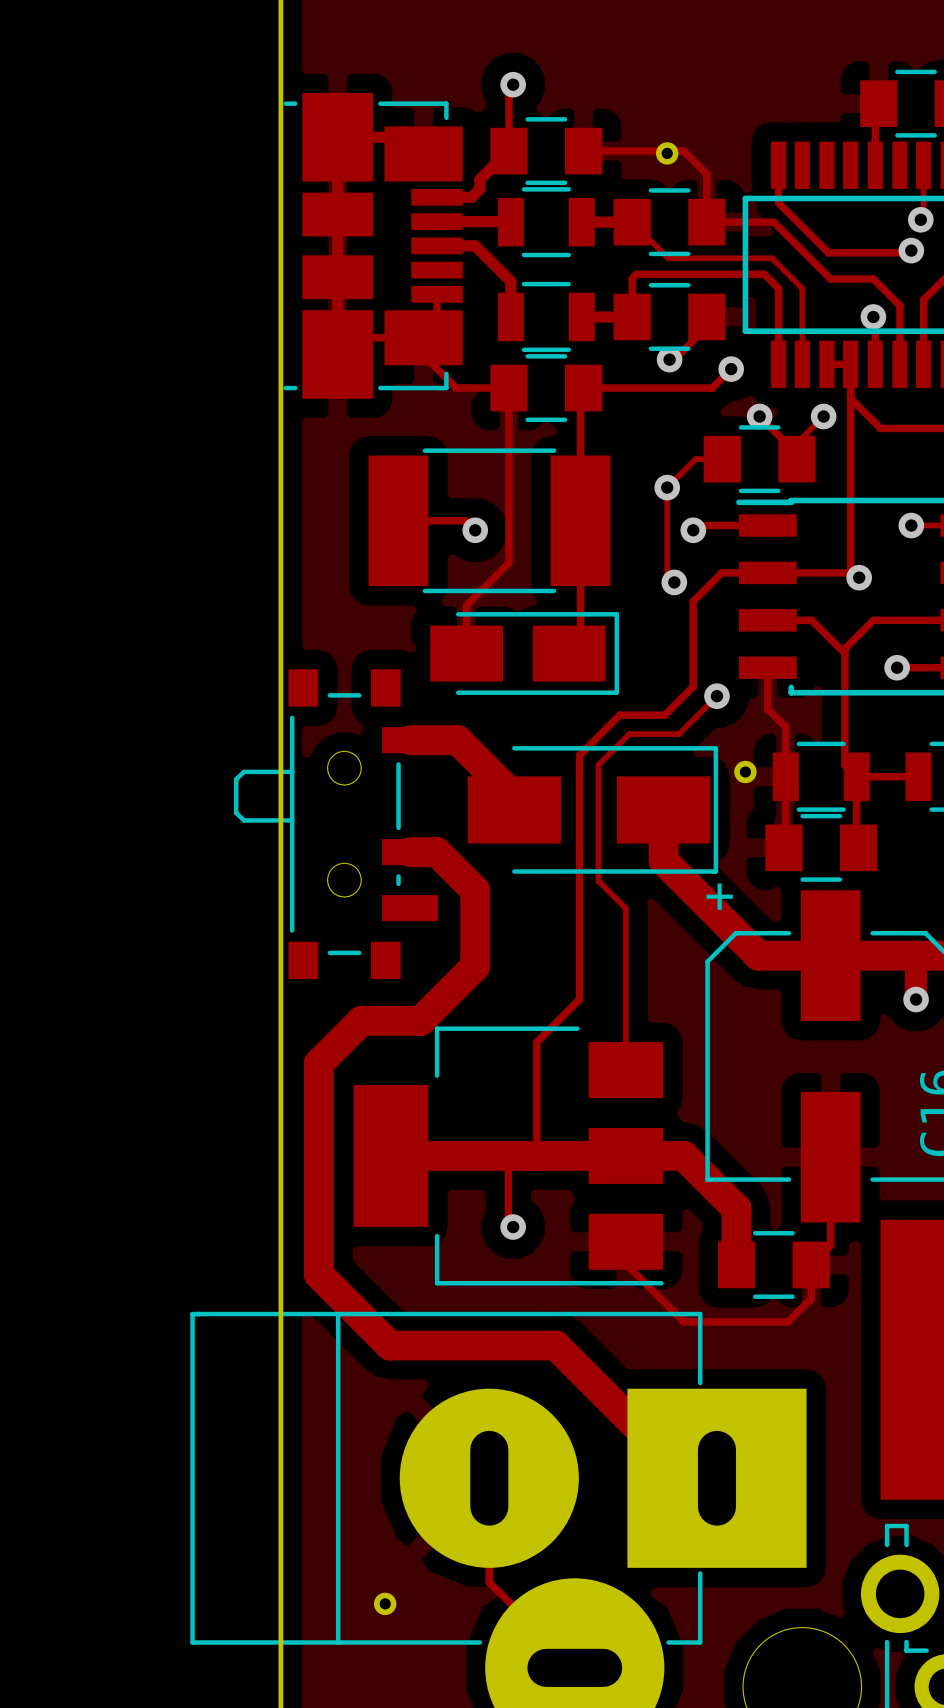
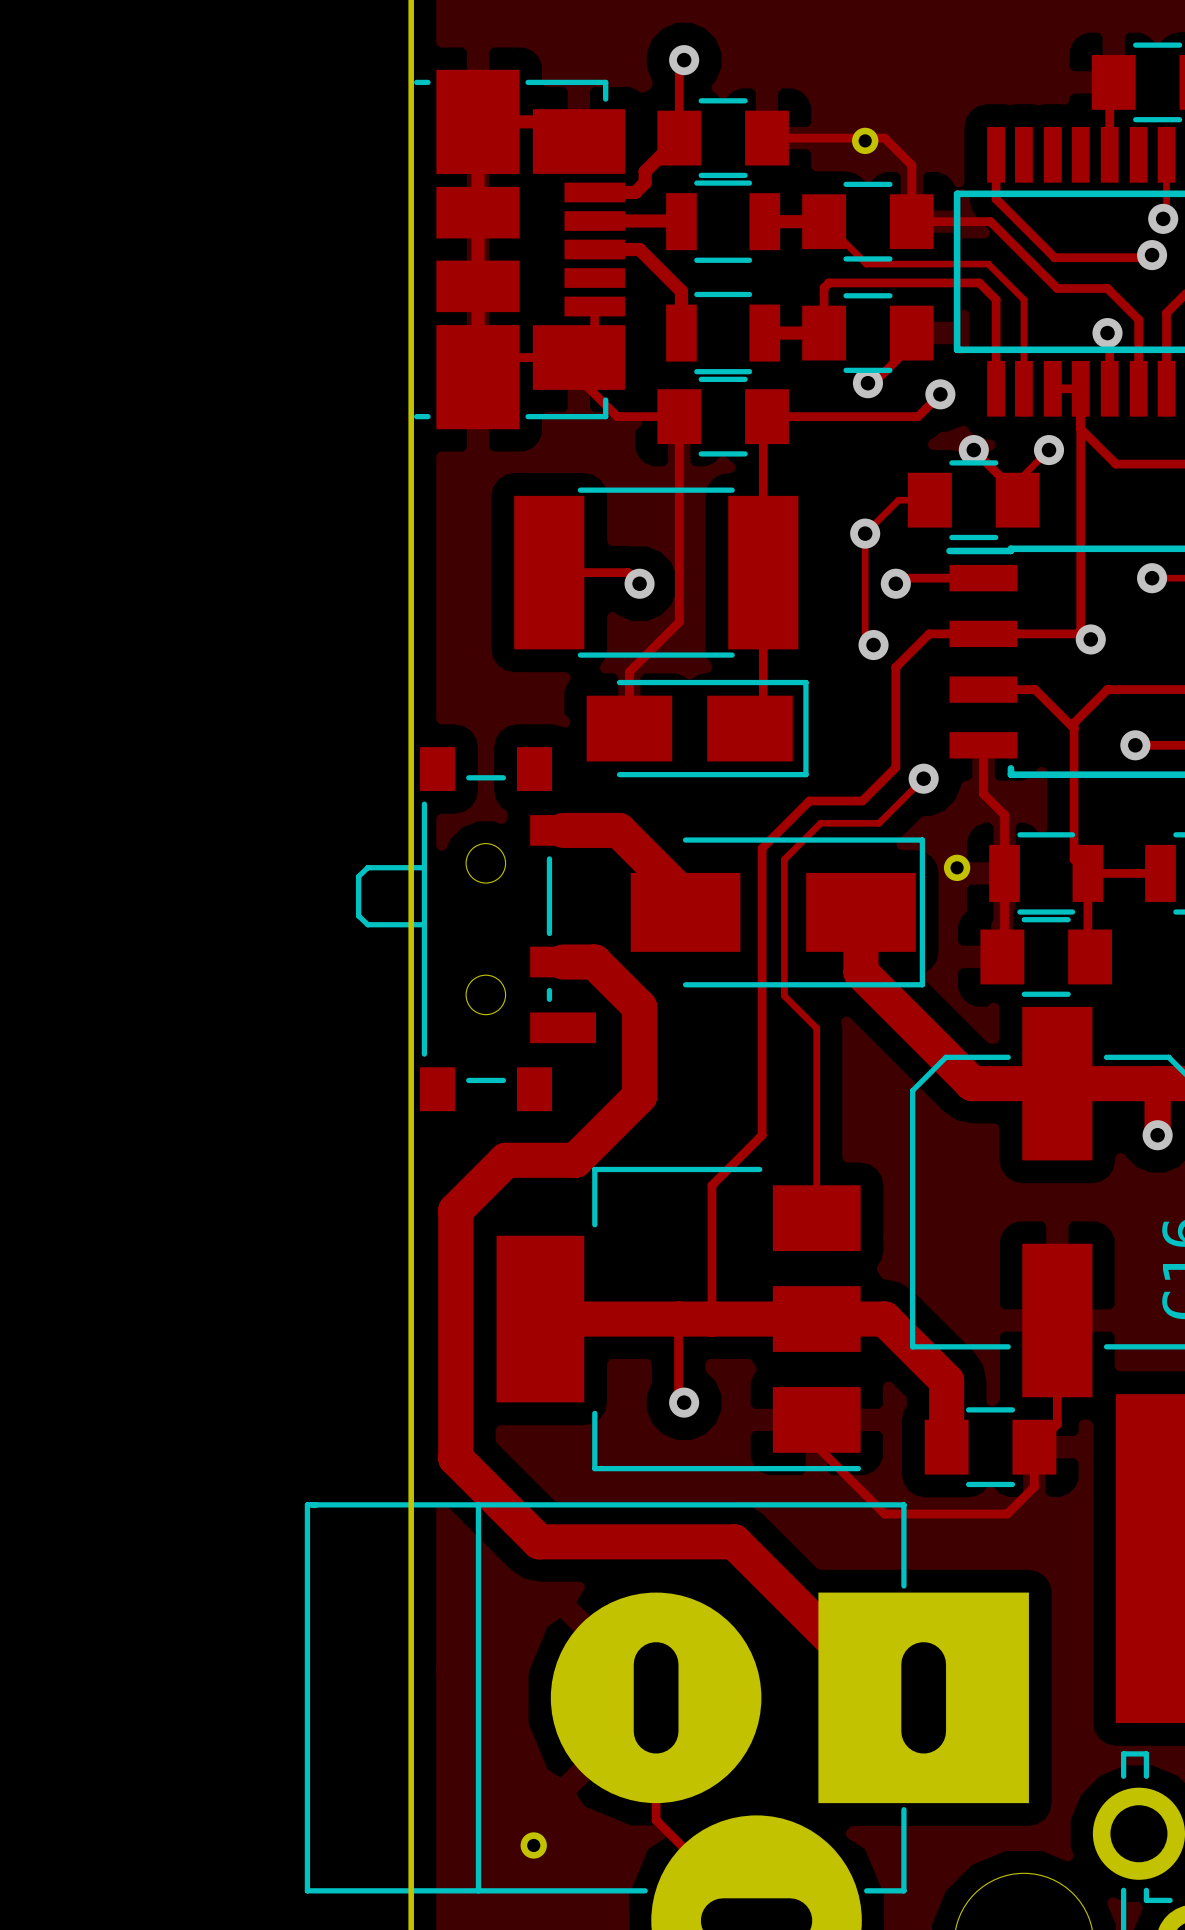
part text: + (719, 896) -> none

